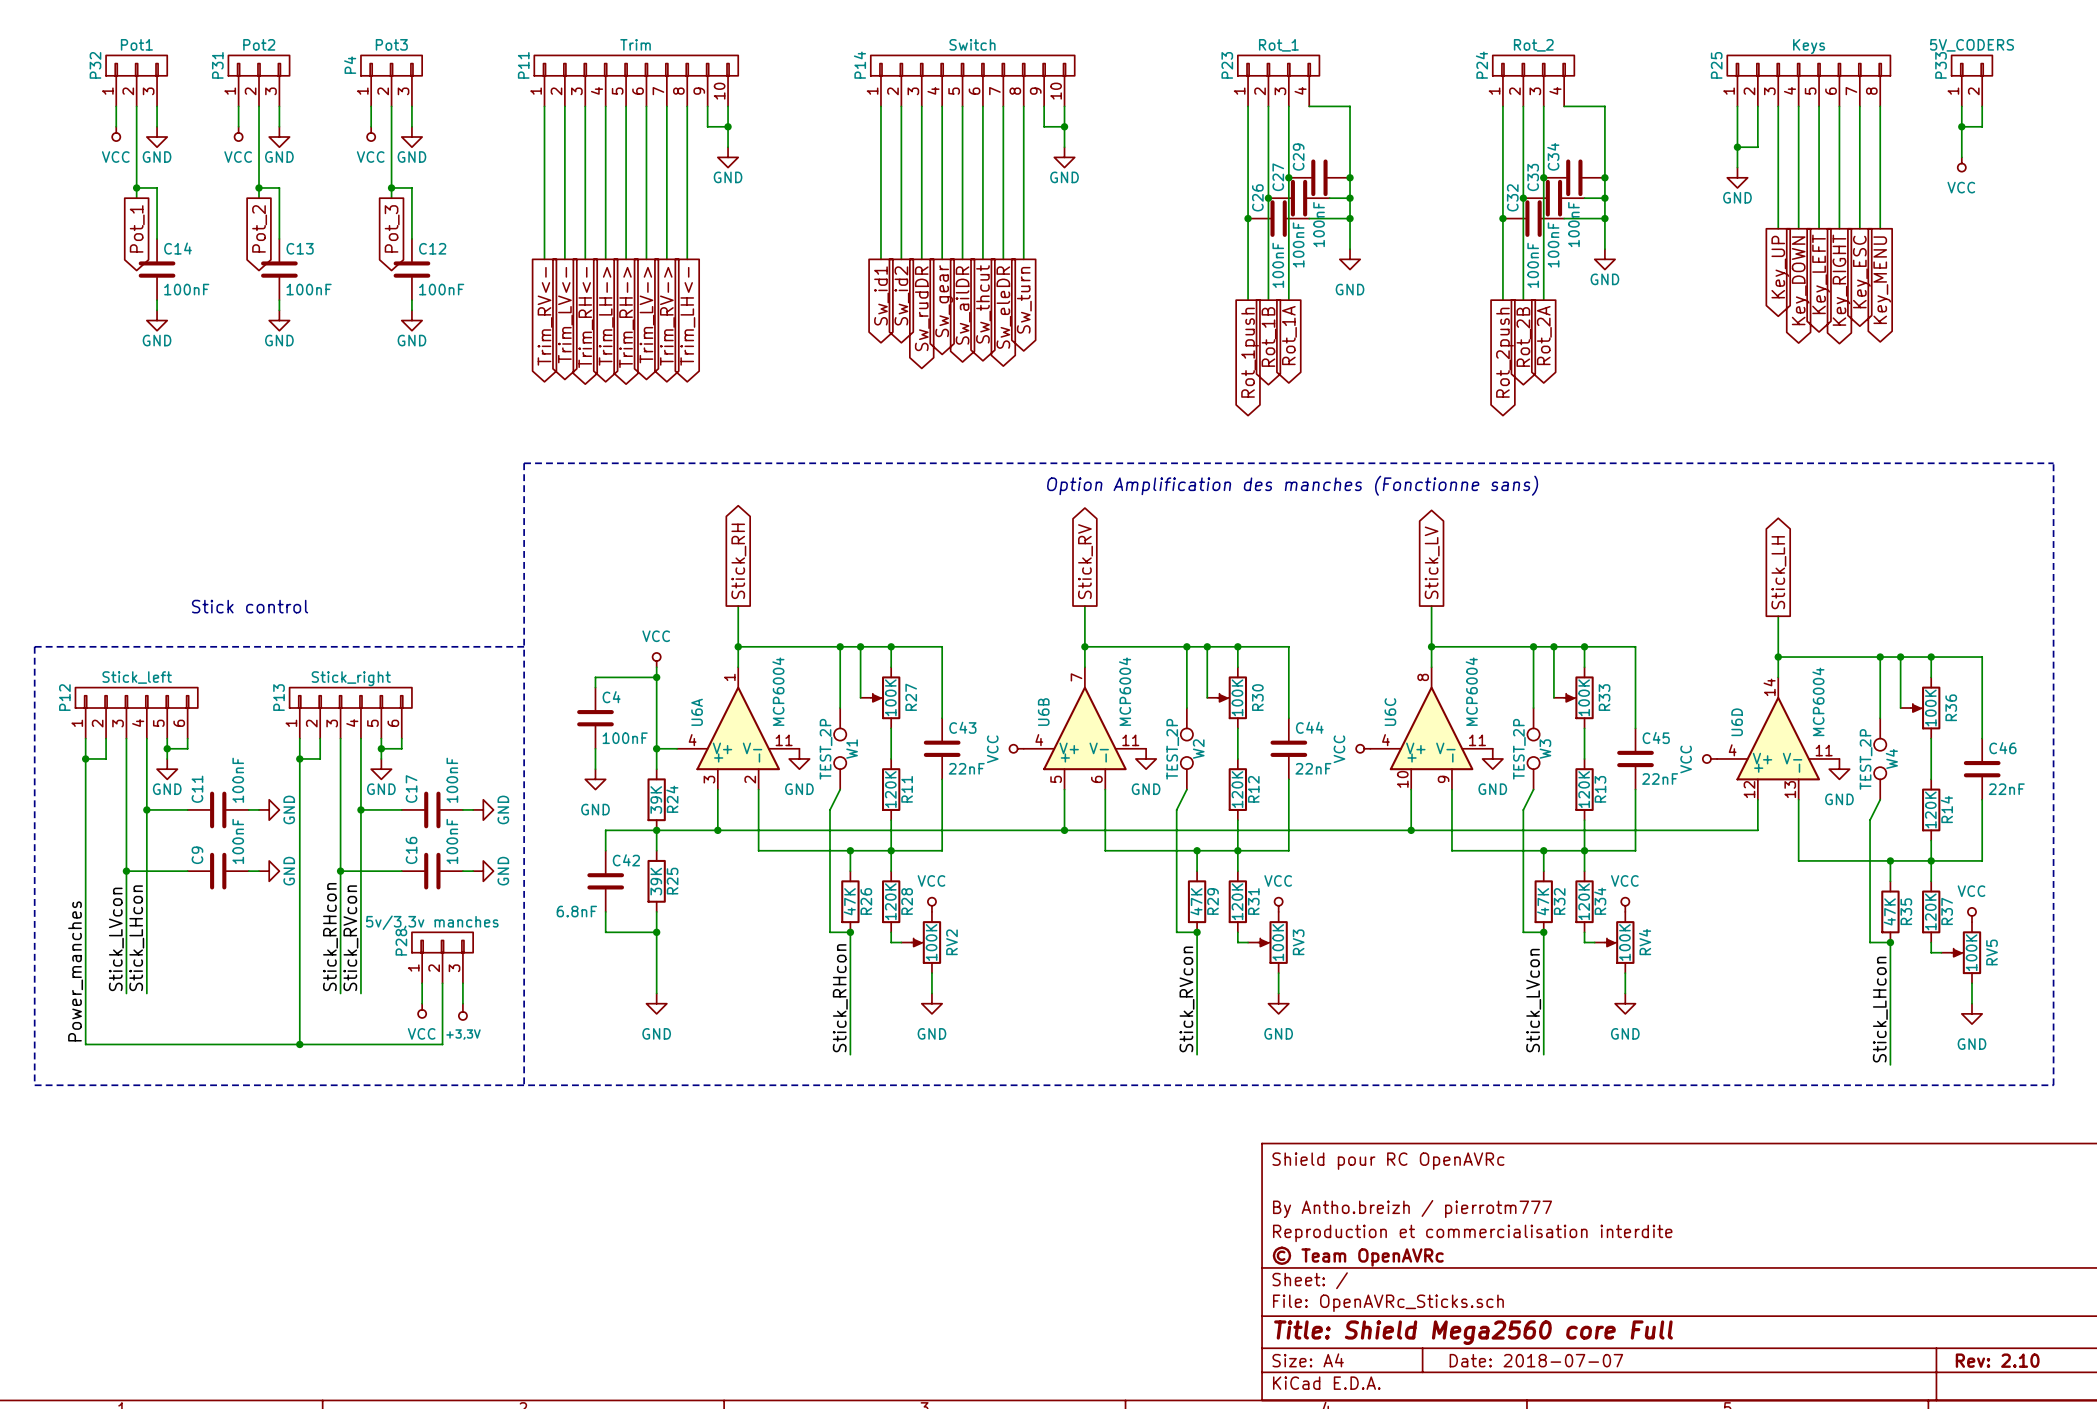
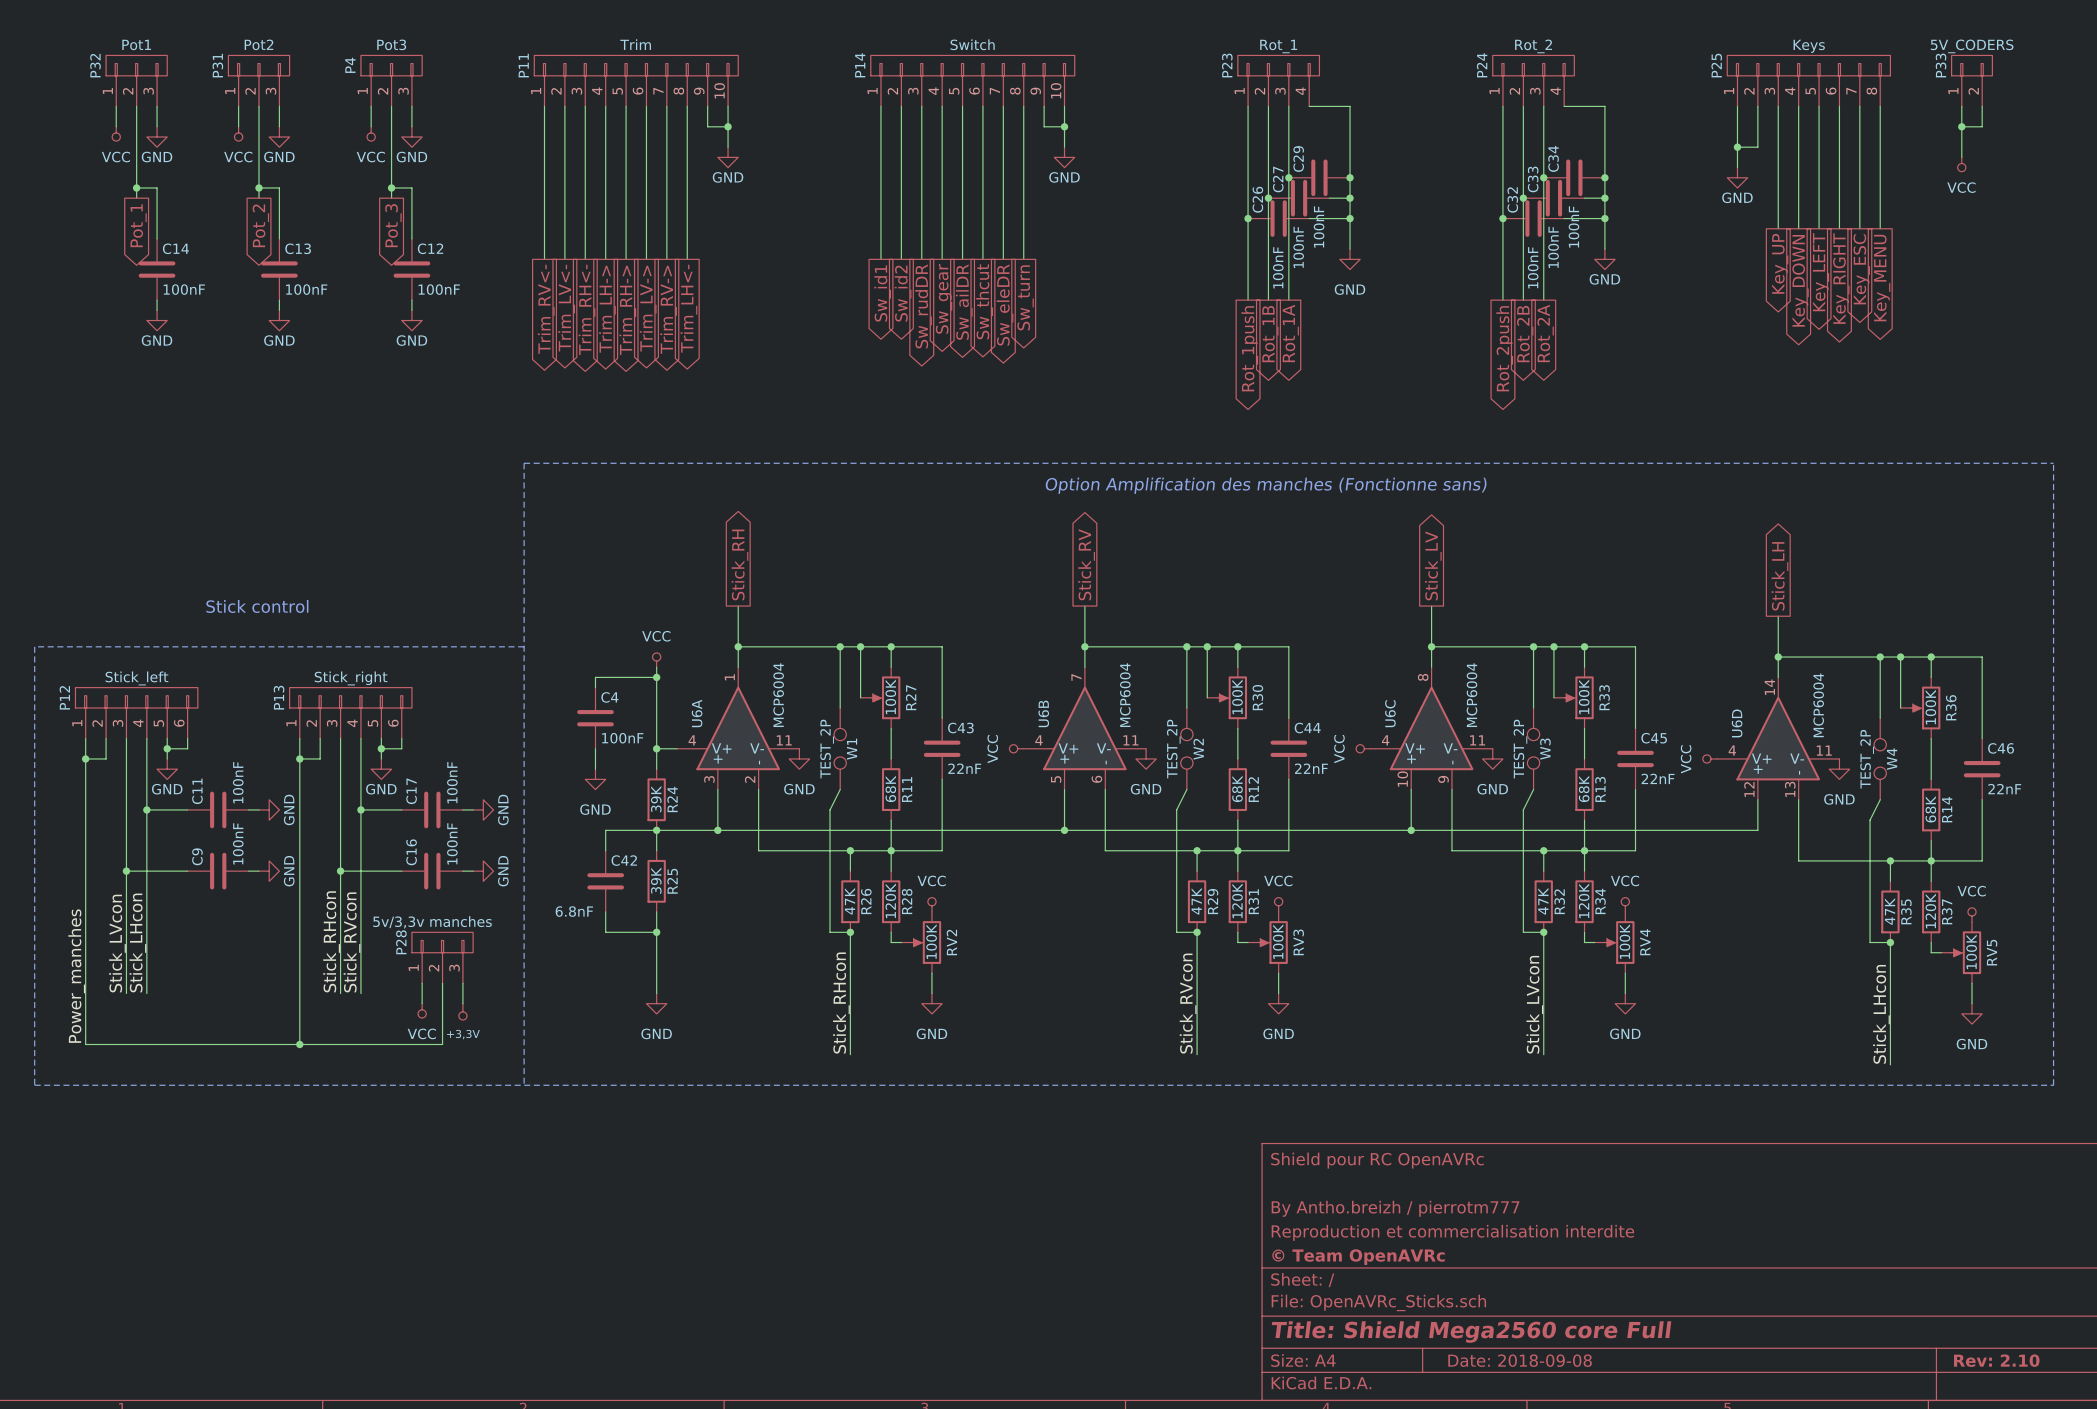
R11 value: 120K (890, 789) -> 68K (890, 788)
R12 value: 120K (1237, 789) -> 68K (1237, 788)
R13 value: 120K (1584, 789) -> 68K (1584, 788)
R14 value: 120K (1930, 809) -> 68K (1930, 809)
title block: Date: 2018-07-07 (1536, 1360) -> Date: 2018-09-08 (1520, 1360)

